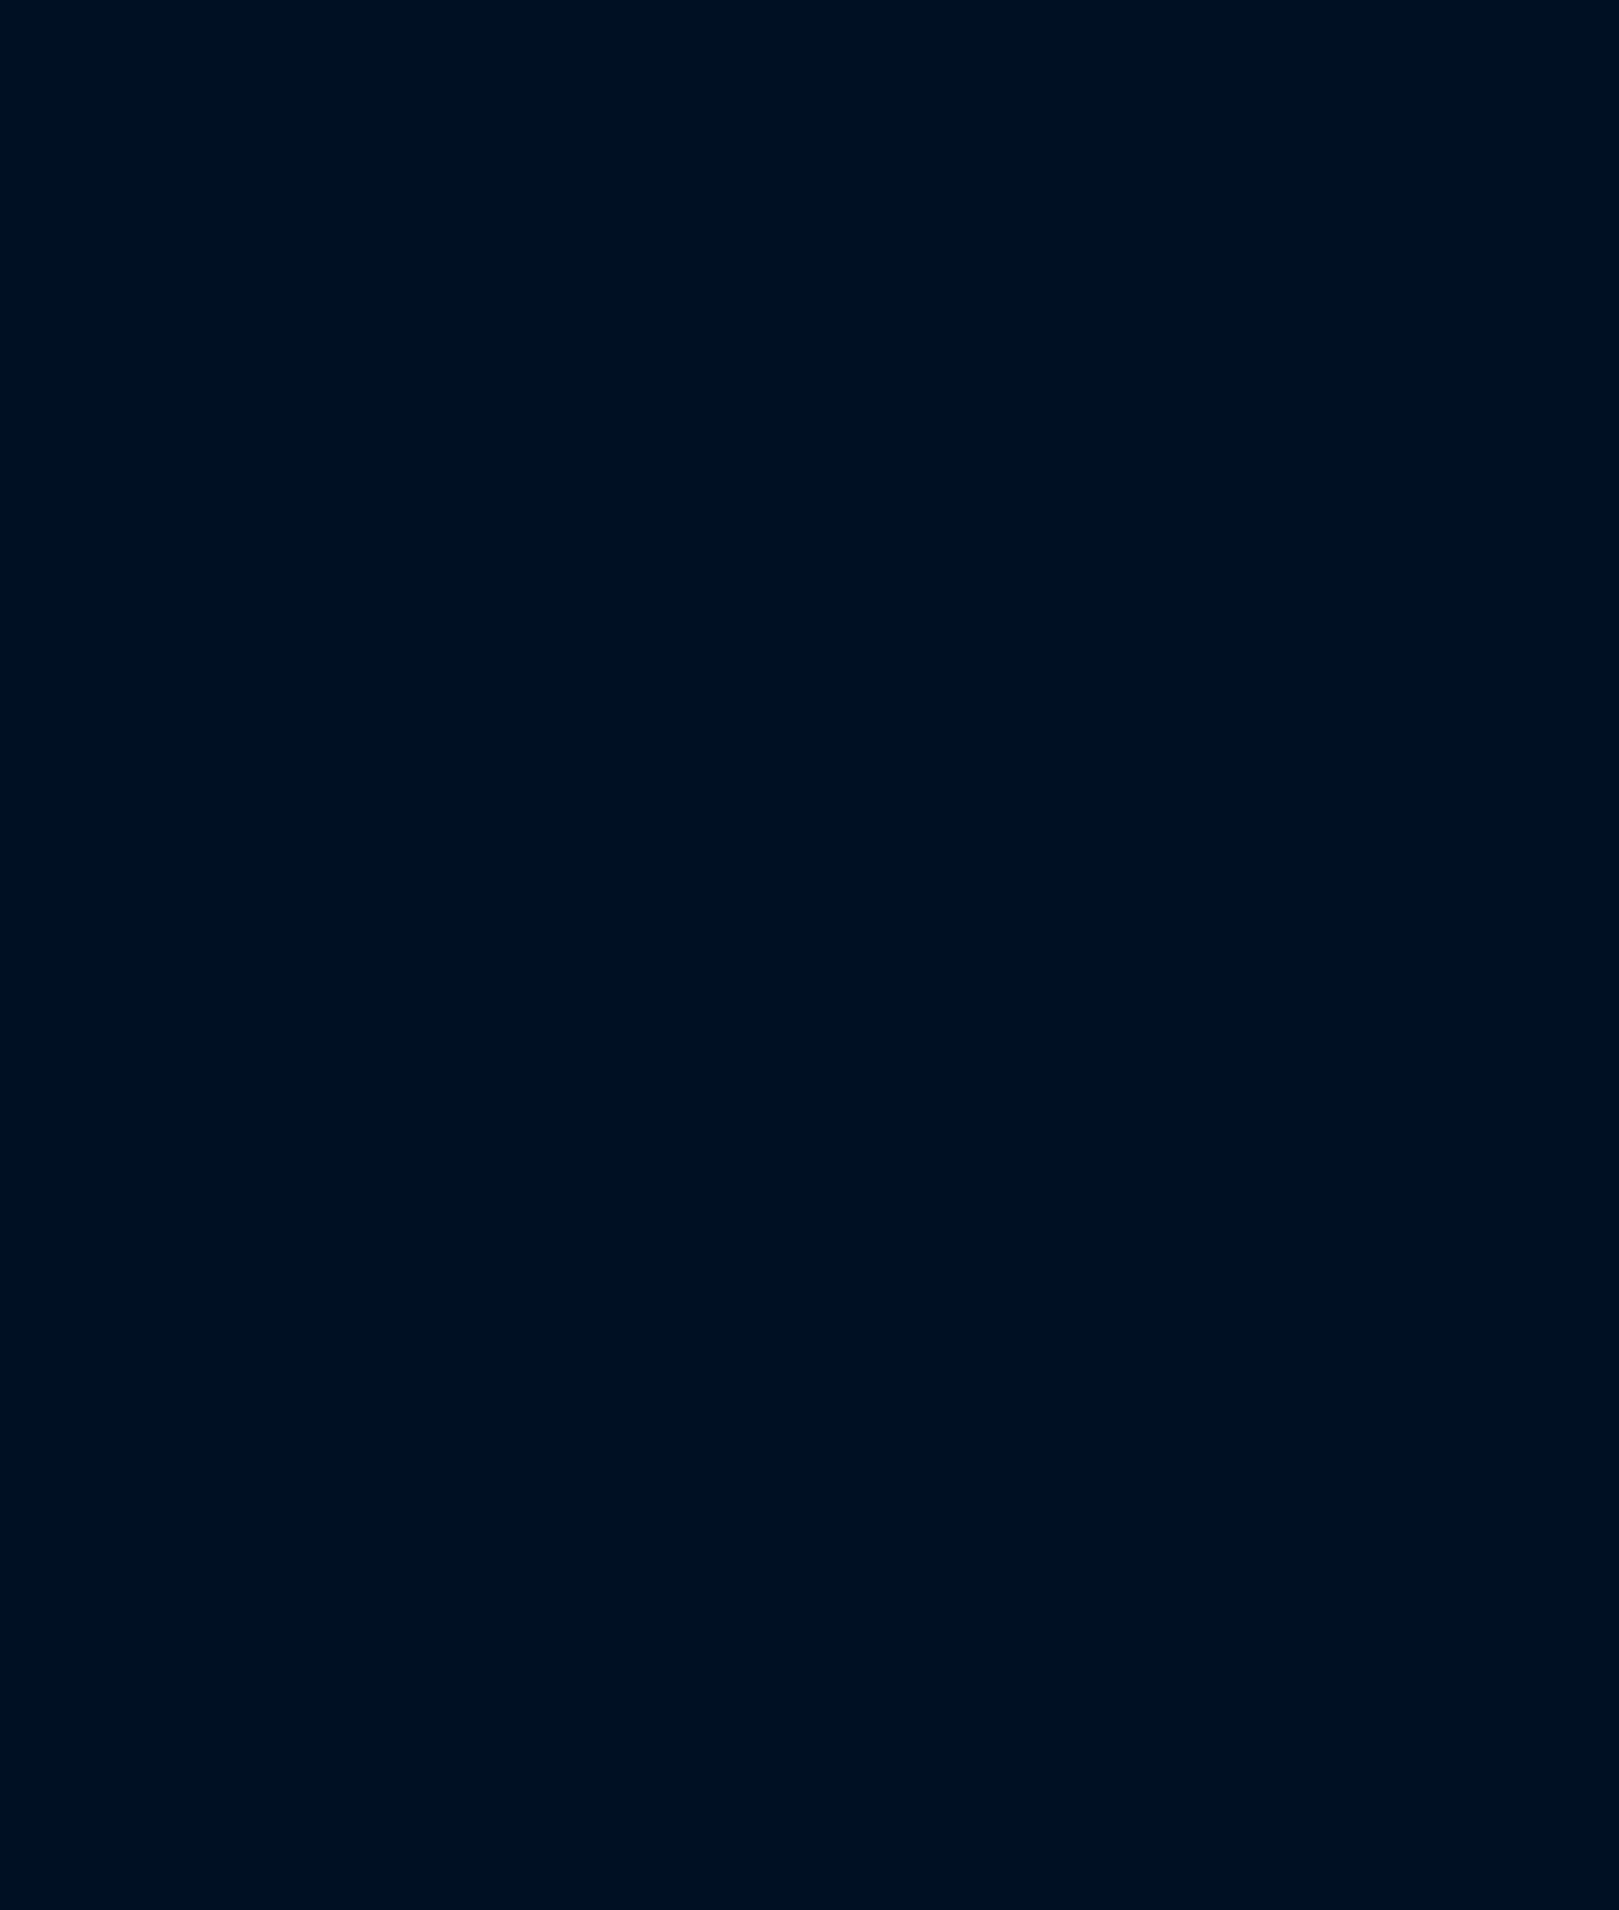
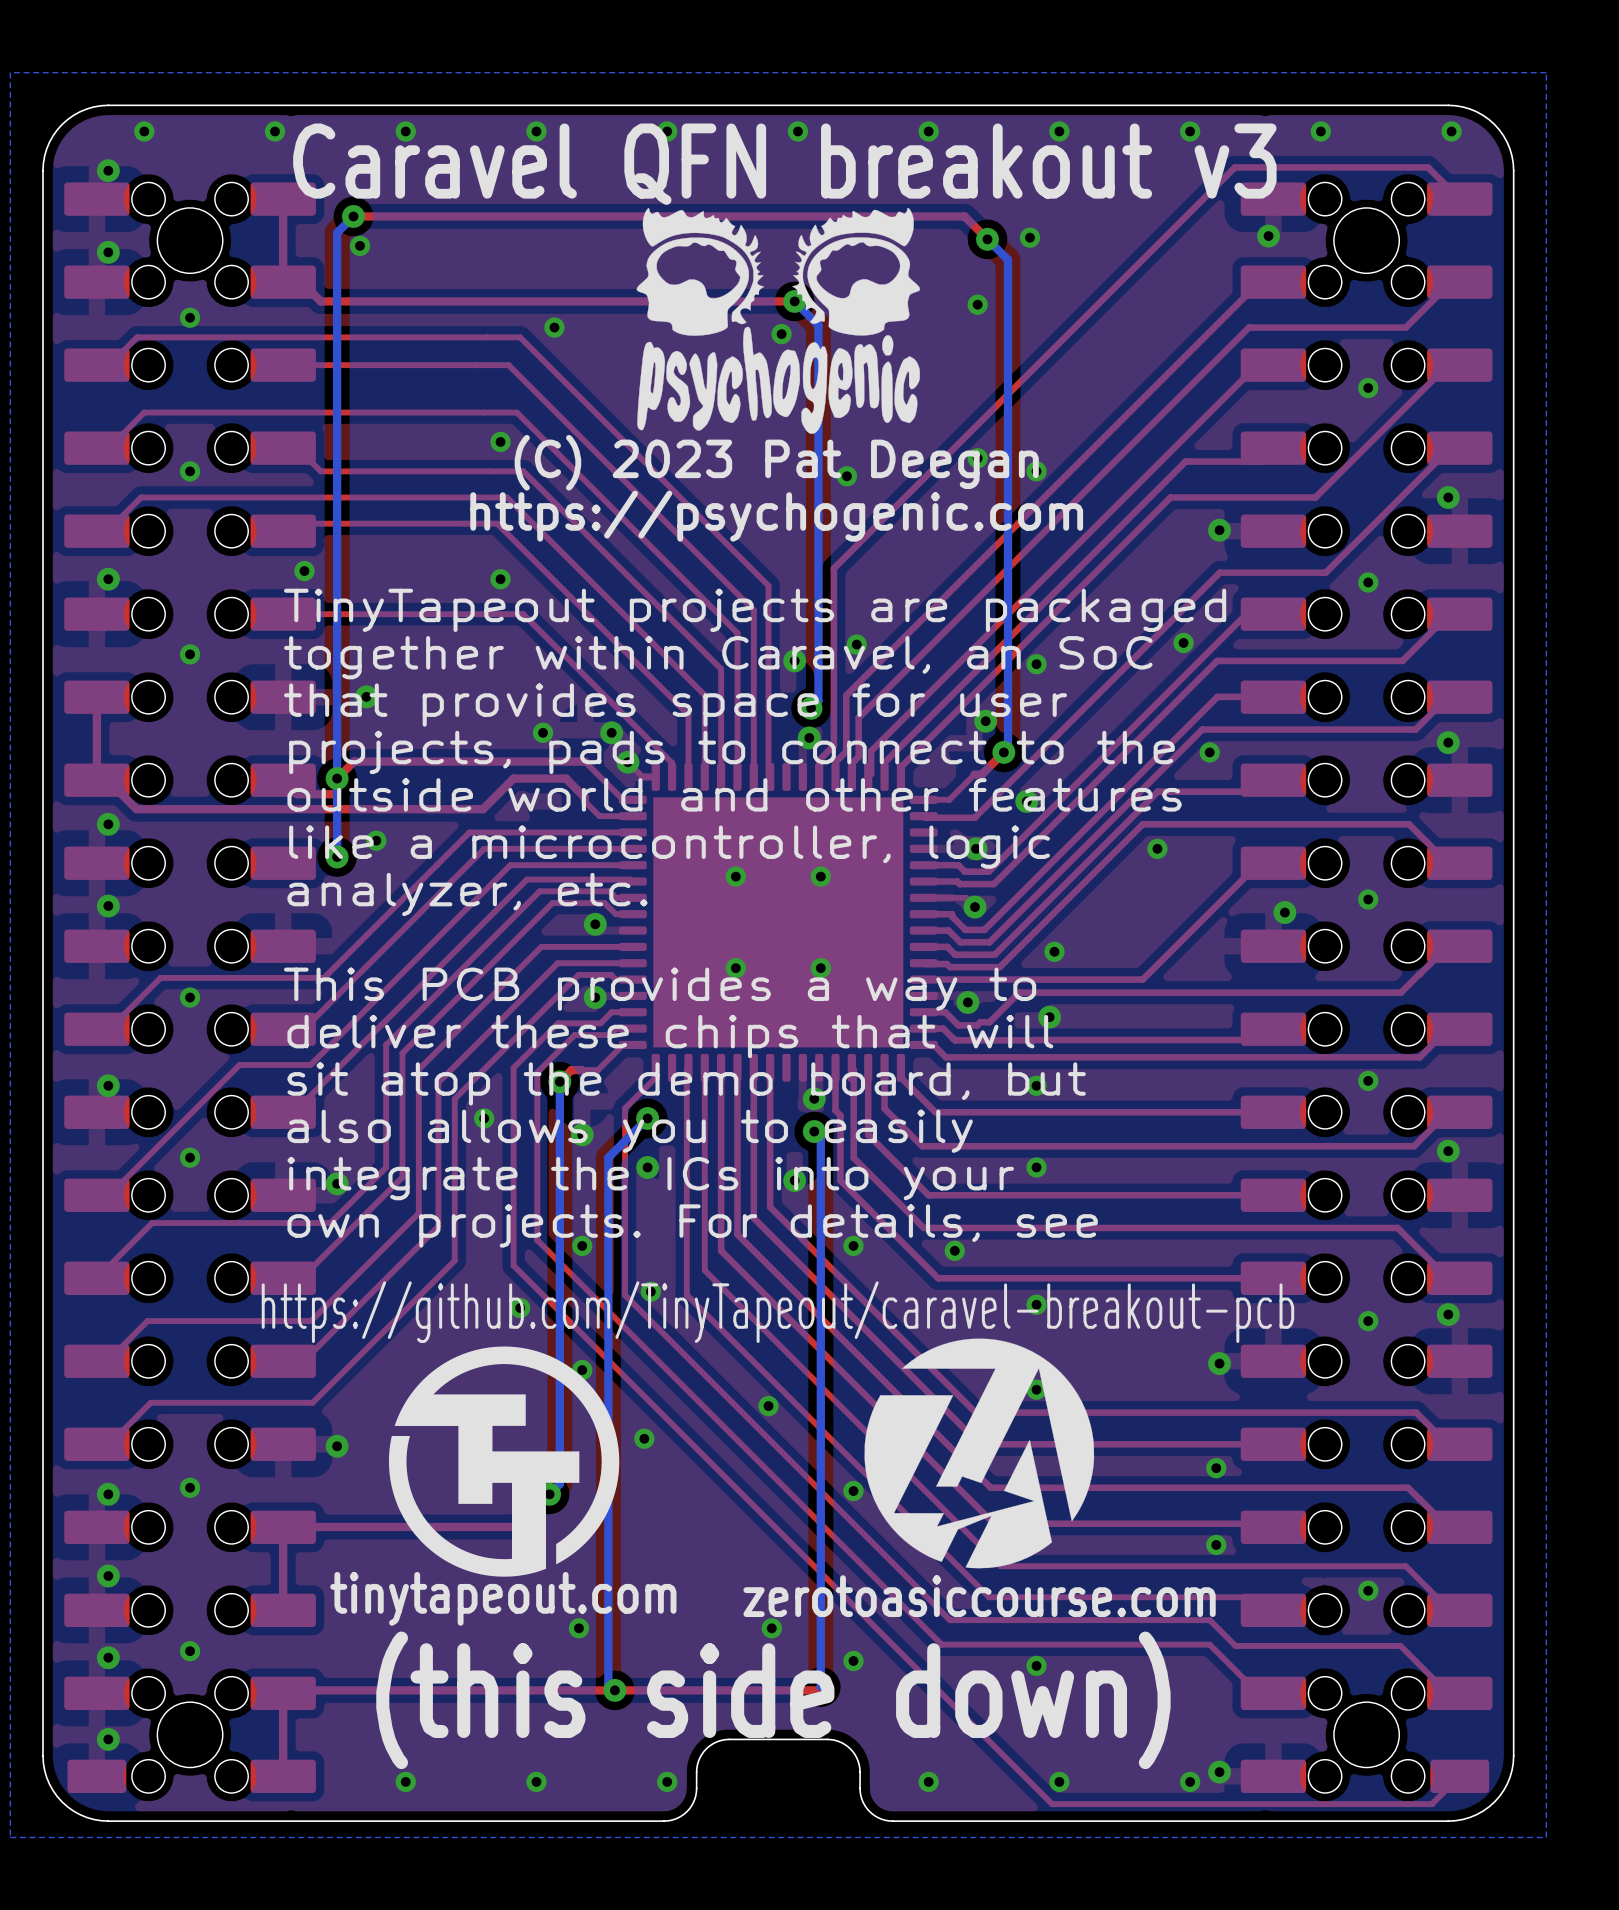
bottom zone outline: none -> (1546, 72) (1546, 1837) (10, 1837) (10, 72) (1546, 72)
board edge: none -> (1448, 105) (108, 105) (93, 106) (80, 111) (67, 119) (57, 129) (46, 149) (42, 170) (42, 1755) (44, 1770) (49, 1784) (57, 1796) (67, 1806) (86, 1817) (108, 1821) (667, 1820) (684, 1814) (693, 1802) (696, 1792) (697, 1764) (703, 1751) (715, 1742) (729, 1739) (827, 1739) (841, 1742) (852, 1751) (858, 1761) (860, 1792) (865, 1805) (875, 1816) (889, 1820) (1448, 1821) (1462, 1819) (1476, 1814) (1489, 1806) (1499, 1796) (1510, 1777) (1513, 1755) (1513, 170) (1512, 156) (1507, 142) (1494, 124) (1483, 115) (1469, 109) (1448, 105)
part: none -> (144, 131)
part: none -> (275, 131)
part: none -> (405, 131)
part: none -> (536, 131)
part: none -> (667, 131)
part: none -> (797, 131)
part: none -> (928, 131)
part: none -> (1059, 131)
part: none -> (1190, 131)
part: none -> (1320, 131)
part: none -> (1451, 131)
text: none -> Caravel QFN breakout v3 (784, 164)
via: none -> (108, 170)
top track: none -> (283, 199) (283, 282) (301, 282) (320, 301) (794, 301)
top track: none -> (1459, 199) (1428, 167) (1234, 167) (833, 568) (833, 745) (819, 760) (819, 776)
drawing: none -> [636, 207, 920, 434]
top track: none -> (353, 216) (964, 216) (987, 239)
bottom track: none -> (353, 216) (337, 232) (337, 857)
via: none -> (353, 216)
via: none -> (1268, 236)
part: none -> (1029, 237)
bottom track: none -> (987, 239) (1007, 259) (1007, 748) (1003, 752)
via: none -> (987, 239)
part: none -> (360, 245)
via: none -> (108, 252)
top track: none -> (1273, 282) (1259, 282) (846, 695) (846, 751) (835, 762) (835, 776)
top track: none -> (1459, 282) (1451, 282) (1405, 327) (1248, 327) (858, 717) (858, 756) (851, 763) (851, 776)
bottom track: none -> (794, 301) (818, 325) (818, 700) (811, 708)
via: none -> (794, 301)
part: none -> (977, 304)
part: none -> (190, 317)
part: none -> (554, 327)
part: none -> (781, 334)
top track: none -> (96, 365) (109, 365) (137, 337) (520, 337) (768, 585) (768, 775) (770, 776)
top track: none -> (283, 365) (508, 365) (753, 610) (753, 776)
top track: none -> (1273, 365) (1257, 365) (871, 751) (871, 774) (868, 776)
top track: none -> (1436, 376) (1315, 497) (1170, 497) (900, 767) (900, 776)
part: none -> (1368, 388)
part: none -> (500, 441)
top track: none -> (96, 448) (108, 448) (144, 412) (516, 412) (737, 633) (737, 776)
top track: none -> (283, 448) (297, 448) (320, 471) (523, 471) (721, 669) (721, 776)
top track: none -> (1273, 448) (1260, 461) (1185, 461) (884, 762) (884, 776)
top track: none -> (1459, 448) (1450, 448) (1325, 572) (1219, 572) (975, 817)
part: none -> (977, 458)
text: none -> (C) 2023 Pat Deegan (776, 462)
part: none -> (190, 471)
part: none -> (1036, 471)
part: none -> (846, 476)
via: none -> (1448, 497)
text: none -> https://psychogenic.com (776, 516)
via: none -> (1219, 530)
top track: none -> (96, 531) (107, 531) (141, 497) (507, 497) (704, 695) (704, 776)
top track: none -> (283, 531) (290, 523) (497, 523) (688, 714) (688, 776)
part: none -> (304, 571)
via: none -> (108, 579)
part: none -> (500, 579)
part: none -> (1368, 582)
text: none -> TinyTapeout projects are packaged (755, 610)
top track: none -> (283, 614) (523, 614) (672, 763) (672, 776)
top track: none -> (1273, 614) (1246, 614) (988, 871) (964, 871) (958, 865) (923, 865)
top track: none -> (1459, 614) (1449, 614) (1402, 660) (1217, 660) (993, 884) (923, 881)
part: none -> (1183, 642)
part: none -> (856, 644)
part: none -> (190, 654)
text: none -> together within Caravel, an SoC (718, 657)
via: none -> (794, 660)
part: none -> (1036, 664)
via: none -> (366, 696)
top track: none -> (1273, 696) (1217, 696) (984, 929) (965, 929) (952, 914) (923, 914)
top track: none -> (96, 697) (96, 780) (107, 780) (136, 809) (482, 809) (513, 778) (565, 778) (599, 816) (632, 816)
top track: none -> (1459, 697) (1447, 697) (1415, 729) (1202, 729) (989, 942) (960, 942) (948, 930) (923, 930)
text: none -> that provides space for user (675, 705)
via: none -> (811, 708)
via: none -> (985, 721)
part: none -> (543, 732)
via: none -> (611, 732)
via: none -> (809, 737)
via: none -> (1448, 742)
text: none -> projects, pads to connect to the (732, 752)
top track: none -> (1003, 752) (981, 774) (974, 774) (949, 799) (923, 799)
via: none -> (1003, 752)
part: none -> (1209, 752)
top track: none -> (585, 761) (354, 761) (337, 778) (337, 791) (333, 794) (297, 794) (283, 780)
top track: none -> (585, 762) (623, 799) (632, 799)
top track: none -> (628, 762) (642, 776) (655, 776)
via: none -> (628, 762)
via: none -> (337, 778)
top track: none -> (1273, 780) (1262, 791) (1157, 791) (994, 954) (955, 954) (947, 946) (923, 946)
text: none -> outside world and other features (734, 794)
via: none -> (1026, 801)
top track: none -> (923, 816) (925, 817) (975, 817)
via: none -> (108, 824)
top track: none -> (632, 832) (469, 832) (324, 977) (160, 977) (109, 1029) (96, 1029)
part: none -> (376, 840)
text: none -> like a microcontroller, logic (669, 847)
top track: none -> (632, 848) (484, 848) (303, 1029) (283, 1029)
via: none -> (976, 848)
part: none -> (1157, 848)
via: none -> (337, 857)
top track: none -> (1273, 863) (1259, 863) (1142, 979) (923, 979)
top track: none -> (1459, 863) (1447, 863) (1409, 824) (1142, 824) (999, 967) (950, 967) (946, 964) (923, 963)
top track: none -> (632, 865) (510, 865) (310, 1064) (239, 1064) (109, 1195) (96, 1195)
part: none -> (735, 876)
part: none -> (820, 876)
top track: none -> (632, 881) (630, 879) (527, 879) (381, 1025)
text: none -> analyzer, etc. (467, 894)
top track: none -> (632, 897) (616, 897) (609, 891) (539, 891) (386, 1044) (386, 1167) (330, 1223) (152, 1223) (96, 1278)
top track: none -> (923, 897) (965, 897) (974, 907)
part: none -> (1368, 899)
via: none -> (108, 906)
via: none -> (974, 907)
via: none -> (1284, 912)
top track: none -> (632, 914) (615, 914) (604, 903) (552, 903) (402, 1053) (402, 1177) (301, 1278) (283, 1278)
part: none -> (778, 922)
via: none -> (595, 924)
top track: none -> (632, 946) (541, 946) (418, 1069) (418, 1213) (310, 1321) (147, 1321) (107, 1361) (96, 1361)
part: none -> (1054, 951)
top track: none -> (1436, 957) (1419, 974)
top track: none -> (632, 963) (557, 963) (438, 1082) (438, 1226) (303, 1361) (283, 1361)
part: none -> (735, 968)
part: none -> (820, 968)
top track: none -> (1419, 974) (1400, 992) (1019, 992) (989, 1022) (980, 1022) (977, 1025) (958, 1025) (945, 1012) (923, 1012)
top track: none -> (632, 979) (615, 979) (611, 974) (578, 974) (454, 1098) (454, 1260) (312, 1402) (150, 1402) (109, 1444) (96, 1444)
part: none -> (190, 987)
text: none -> This PCB provides a way to (660, 989)
part: none -> (1366, 987)
part: none -> (190, 997)
via: none -> (595, 997)
via: none -> (967, 1002)
top track: none -> (632, 1012) (611, 1012) (600, 1023) (558, 1023) (513, 1067) (513, 1265) (1052, 1804) (1431, 1804) (1459, 1776)
via: none -> (1049, 1017)
top track: none -> (381, 1025) (294, 1112) (283, 1112)
top track: none -> (632, 1028) (616, 1028) (609, 1035) (574, 1035) (537, 1072) (537, 1240) (941, 1644) (1209, 1644) (1258, 1693) (1273, 1693)
top track: none -> (923, 1028) (943, 1028) (955, 1040) (1033, 1040)
top track: none -> (1273, 1029) (1262, 1040) (1033, 1040)
text: none -> deliver these chips that will (670, 1036)
top track: none -> (1436, 1040) (1419, 1057) (945, 1057) (933, 1044) (923, 1044)
top track: none -> (632, 1044) (623, 1044) (597, 1070) (571, 1070) (559, 1081)
top track: none -> (655, 1067) (655, 1077) (625, 1108) (625, 1295) (949, 1620) (1209, 1620) (1235, 1645) (1400, 1645) (1447, 1693) (1459, 1693)
top track: none -> (688, 1067) (686, 1069) (686, 1294) (989, 1597) (1260, 1597) (1273, 1610)
top track: none -> (704, 1067) (704, 1270) (1000, 1566) (1405, 1566) (1449, 1610) (1459, 1610)
top track: none -> (721, 1067) (721, 1250) (994, 1523) (1269, 1523) (1273, 1527)
top track: none -> (737, 1067) (737, 1234) (990, 1487) (1408, 1487) (1447, 1527) (1459, 1527)
top track: none -> (753, 1067) (753, 1218) (979, 1444) (1273, 1444)
top track: none -> (770, 1067) (770, 1207) (975, 1412) (1416, 1412) (1436, 1432)
top track: none -> (835, 1067) (835, 1110) (840, 1115) (840, 1180) (938, 1278) (1273, 1278)
top track: none -> (851, 1067) (853, 1069) (853, 1157) (923, 1227) (1397, 1227) (1447, 1278) (1459, 1278)
top track: none -> (868, 1067) (868, 1134) (928, 1195) (1273, 1195)
top track: none -> (884, 1067) (884, 1108) (922, 1146) (1413, 1146) (1447, 1112) (1459, 1112)
top track: none -> (900, 1067) (900, 1077) (935, 1112) (1273, 1112)
part: none -> (1368, 1080)
bottom track: none -> (559, 1081) (559, 1484) (549, 1494)
via: none -> (559, 1081)
text: none -> sit atop the demo board, but (686, 1083)
via: none -> (108, 1085)
part: none -> (1036, 1085)
via: none -> (814, 1098)
part: none -> (484, 1118)
bottom track: none -> (647, 1118) (608, 1157) (608, 1683) (614, 1690)
via: none -> (647, 1118)
text: none -> also allows you to easily (630, 1131)
bottom track: none -> (814, 1131) (820, 1138) (820, 1687)
via: none -> (814, 1131)
via: none -> (582, 1134)
via: none -> (1448, 1151)
part: none -> (190, 1157)
via: none -> (647, 1167)
part: none -> (1036, 1167)
text: none -> integrate the ICs into your (650, 1178)
via: none -> (794, 1180)
via: none -> (337, 1183)
text: none -> own projects. For details, see (692, 1225)
part: none -> (582, 1245)
part: none -> (853, 1245)
part: none -> (954, 1250)
part: none -> (650, 1291)
part: none -> (1036, 1304)
part: none -> (520, 1308)
text: none -> https://github.com/TinyTapeout/caravel-breakout-pcb (777, 1312)
via: none -> (1448, 1314)
part: none -> (1368, 1321)
drawing: none -> [864, 1338, 1095, 1569]
drawing: none -> [388, 1346, 620, 1577]
via: none -> (1219, 1363)
part: none -> (582, 1370)
part: none -> (1036, 1389)
part: none -> (768, 1406)
part: none -> (644, 1438)
via: none -> (337, 1446)
part: none -> (1216, 1468)
part: none -> (190, 1487)
part: none -> (853, 1491)
via: none -> (108, 1494)
top track: none -> (549, 1494) (516, 1526) (283, 1526)
via: none -> (549, 1494)
top track: none -> (283, 1527) (283, 1610)
part: none -> (1216, 1544)
via: none -> (108, 1576)
part: none -> (1368, 1590)
text: none -> zerotoasiccourse.com (979, 1596)
text: none -> tinytapeout.com (503, 1598)
part: none -> (578, 1628)
part: none -> (771, 1628)
part: none -> (190, 1651)
via: none -> (108, 1657)
part: none -> (853, 1660)
part: none -> (1036, 1665)
top track: none -> (820, 1687) (817, 1690) (286, 1690) (283, 1693) (283, 1776)
via: none -> (614, 1690)
text: none -> (this side down) (773, 1700)
via: none -> (108, 1739)
via: none -> (1219, 1772)
part: none -> (405, 1781)
part: none -> (536, 1781)
part: none -> (667, 1781)
part: none -> (928, 1781)
part: none -> (1059, 1781)
part: none -> (1190, 1781)

